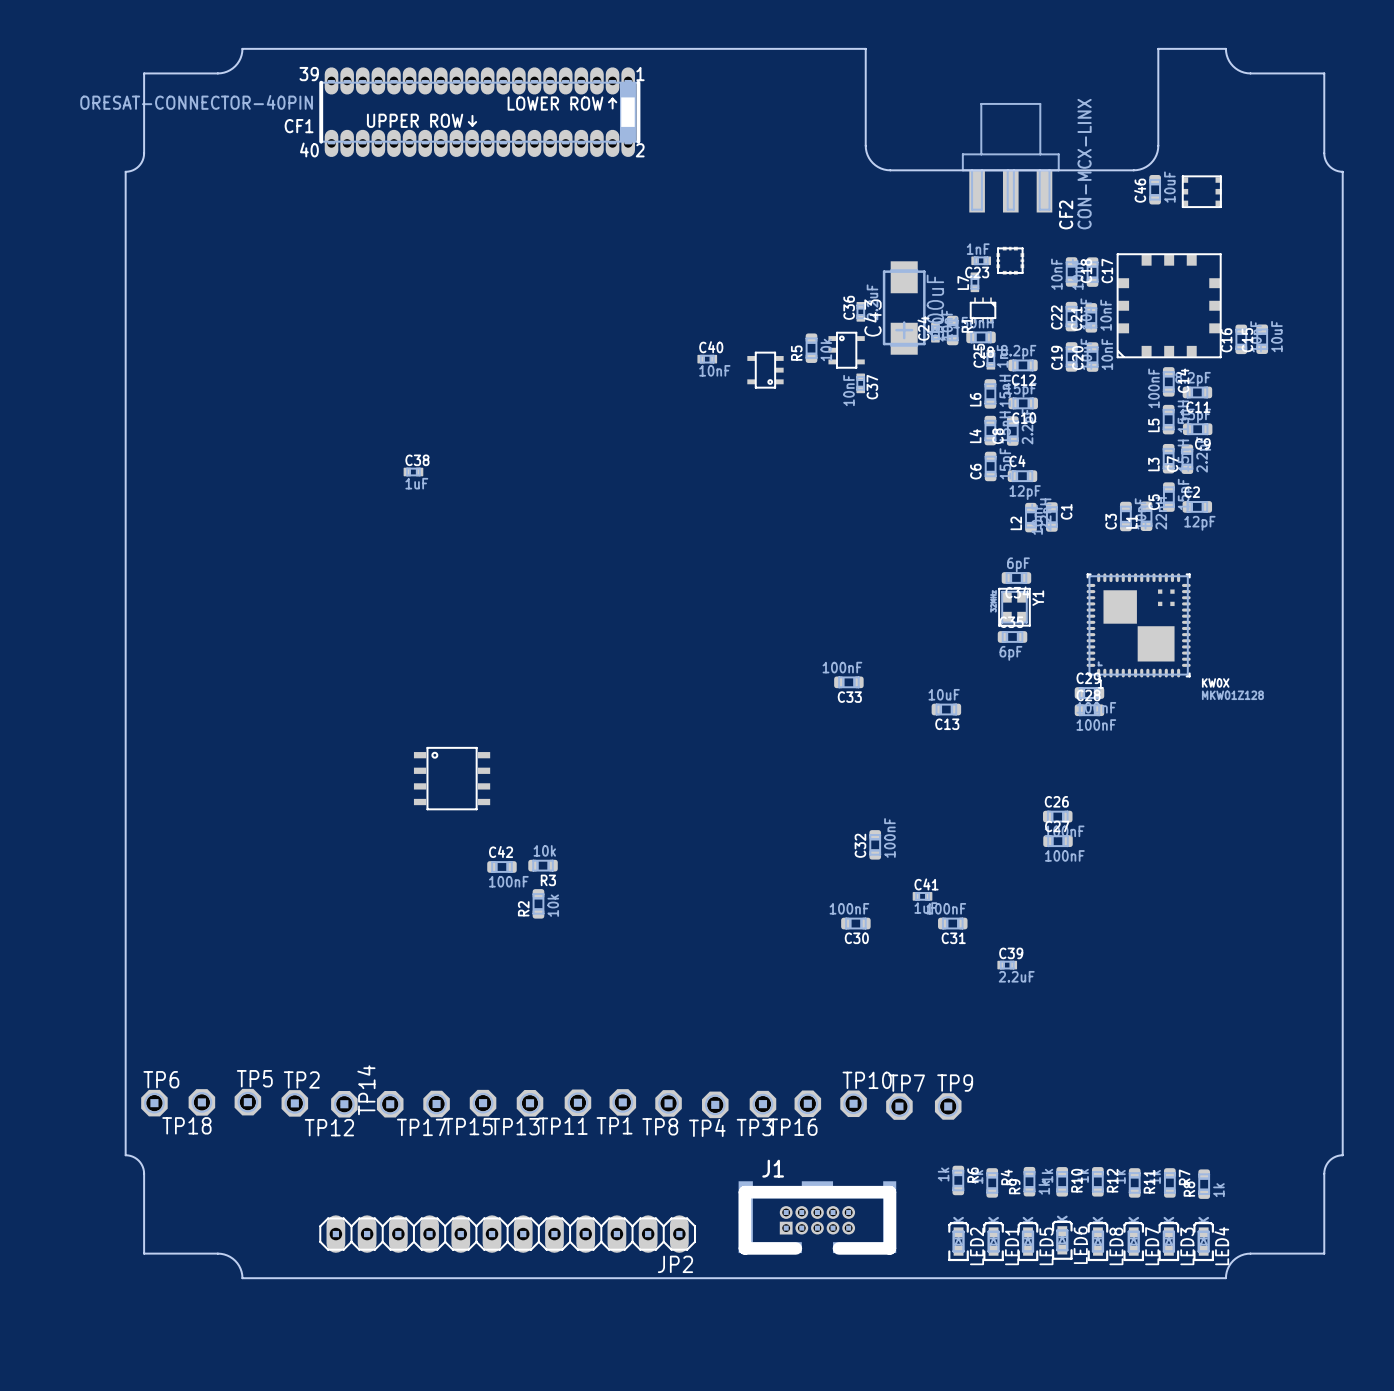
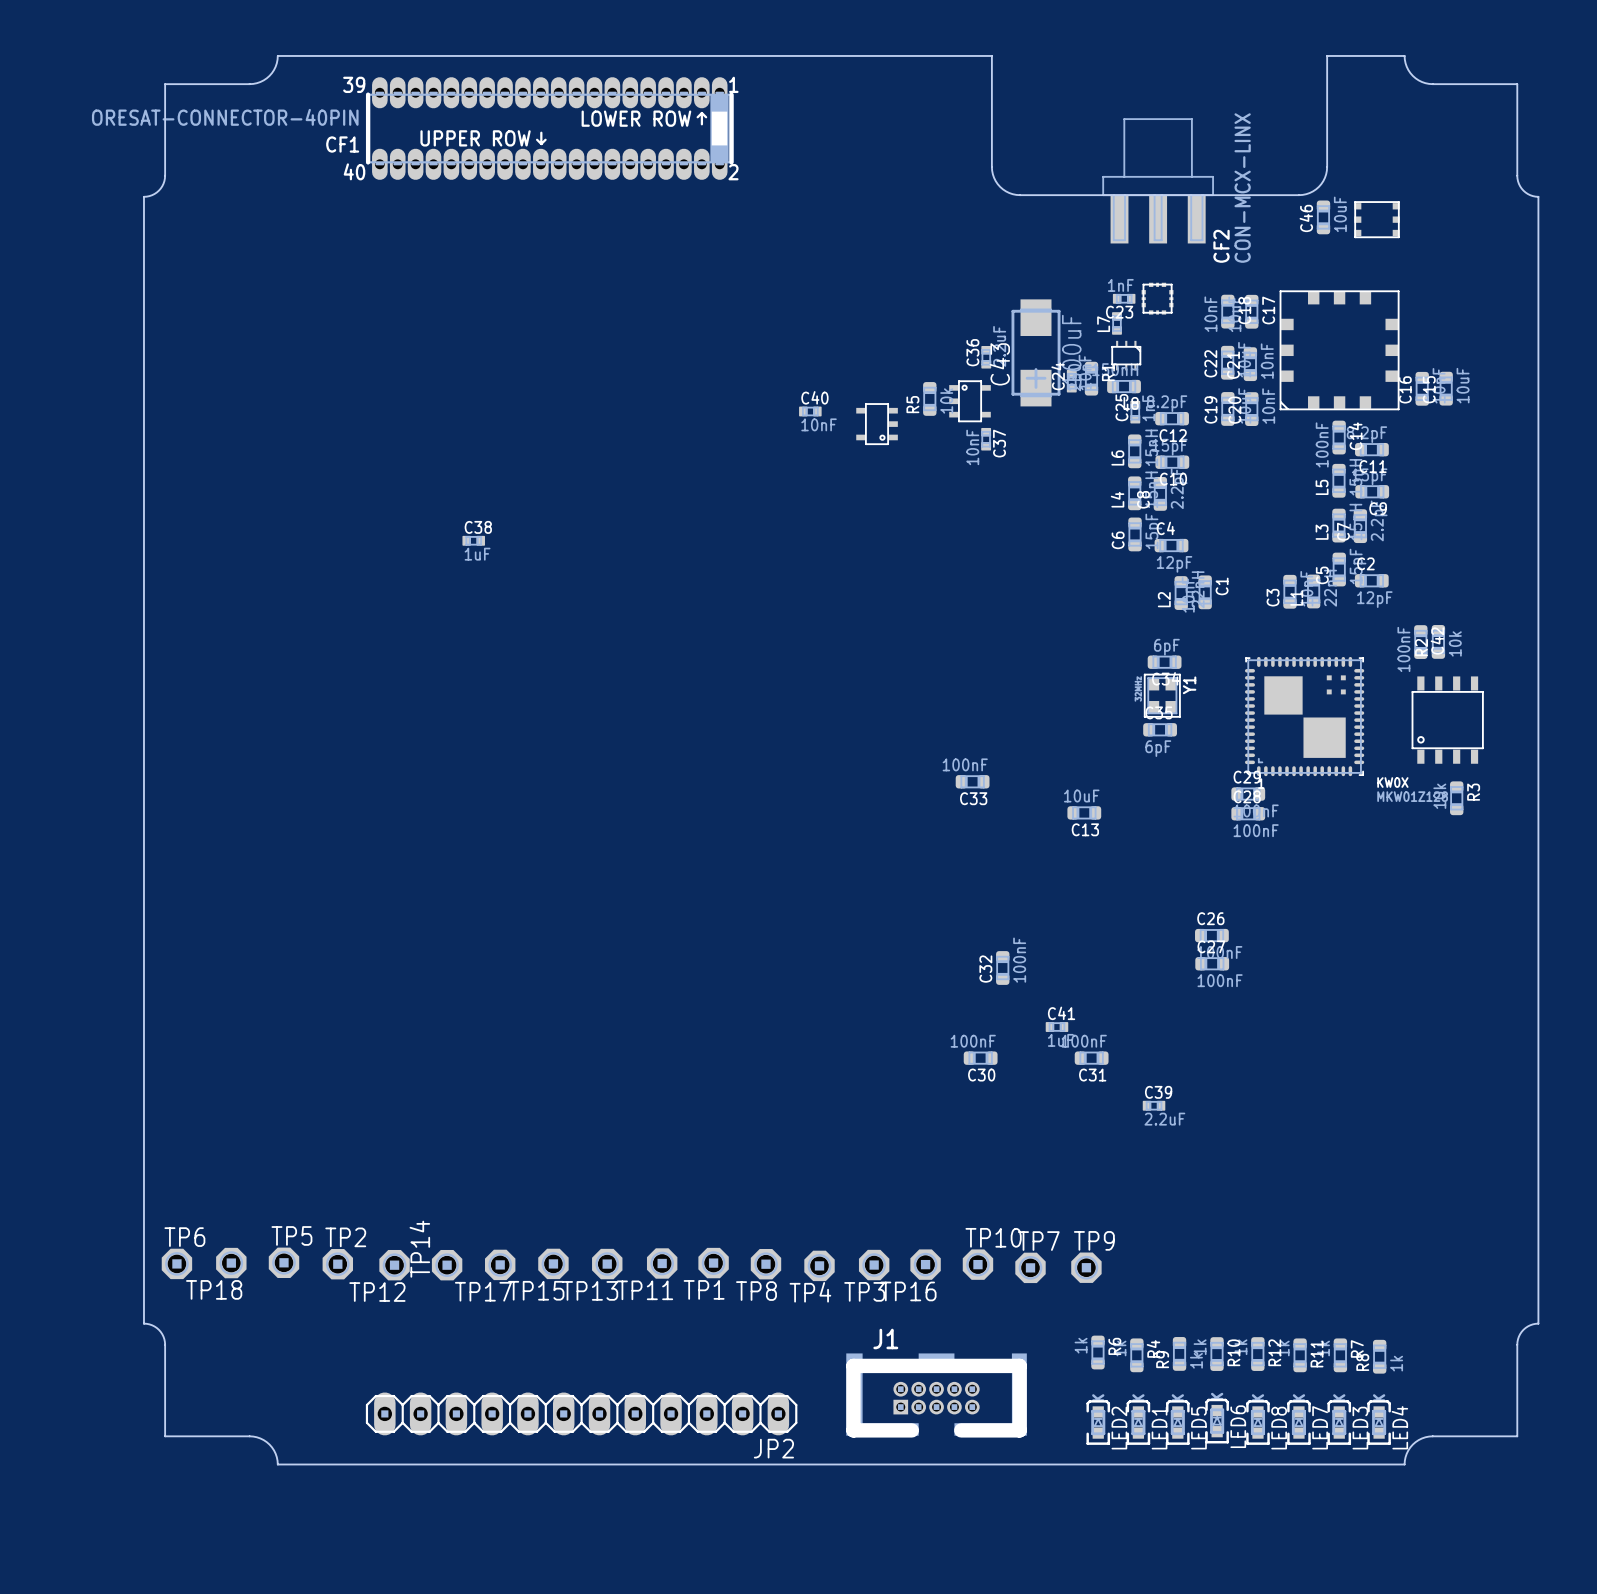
part: none -> (1447, 720)
part: (452, 778) -> none
R3 rotation: 0° (543, 865) -> 90° clockwise (1456, 798)
R3 position: (543, 865) -> (1456, 798)
C42 rotation: 0° (501, 866) -> 90° clockwise (1420, 642)
C42 position: (501, 866) -> (1420, 642)
R2 position: (538, 903) -> (1438, 641)

